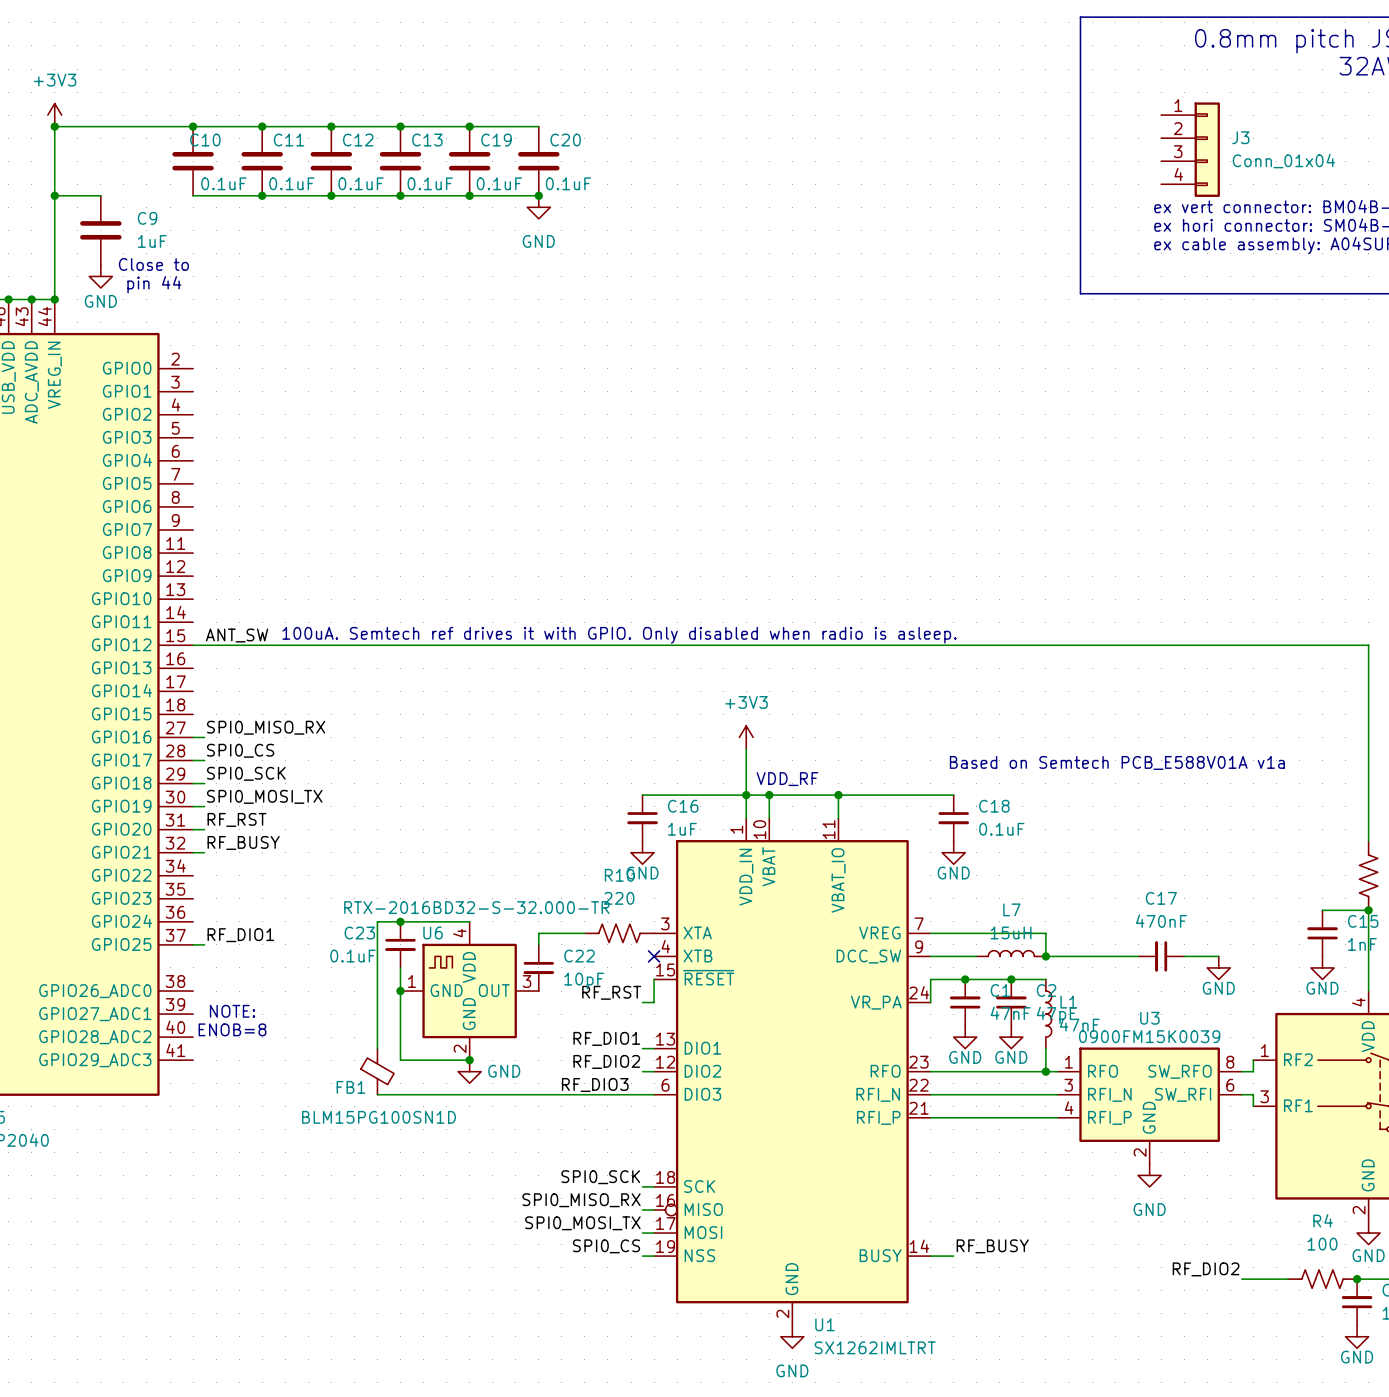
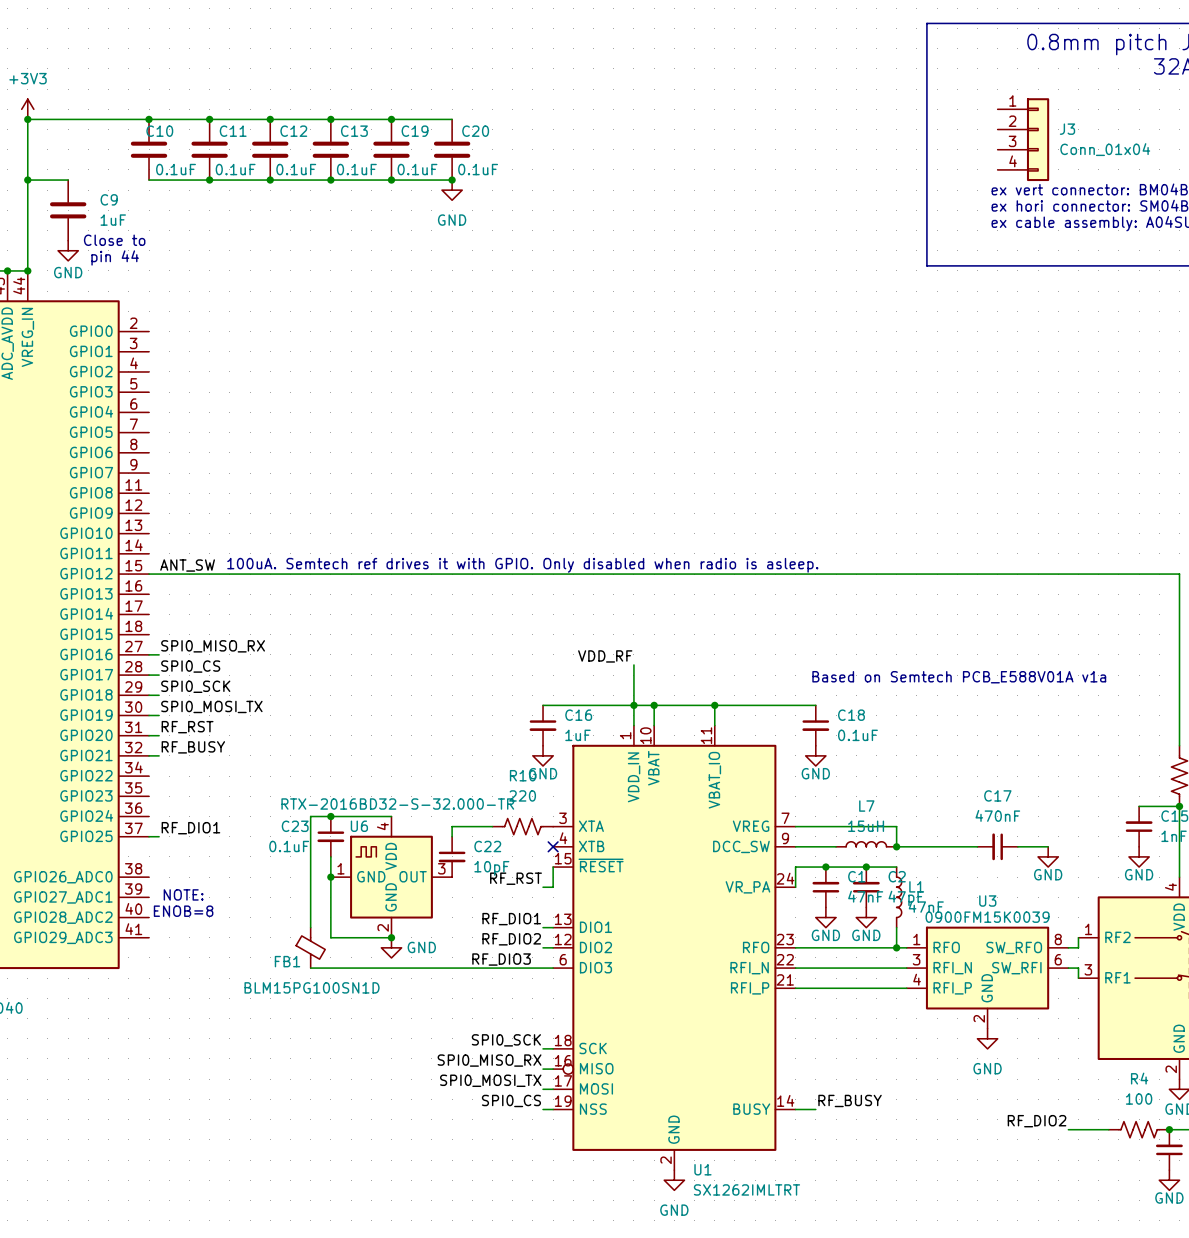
power symbol: +3V3 (746, 737) -> none
label: none -> VDD_RF (605, 656)
text: VDD_RF (787, 779) -> none

